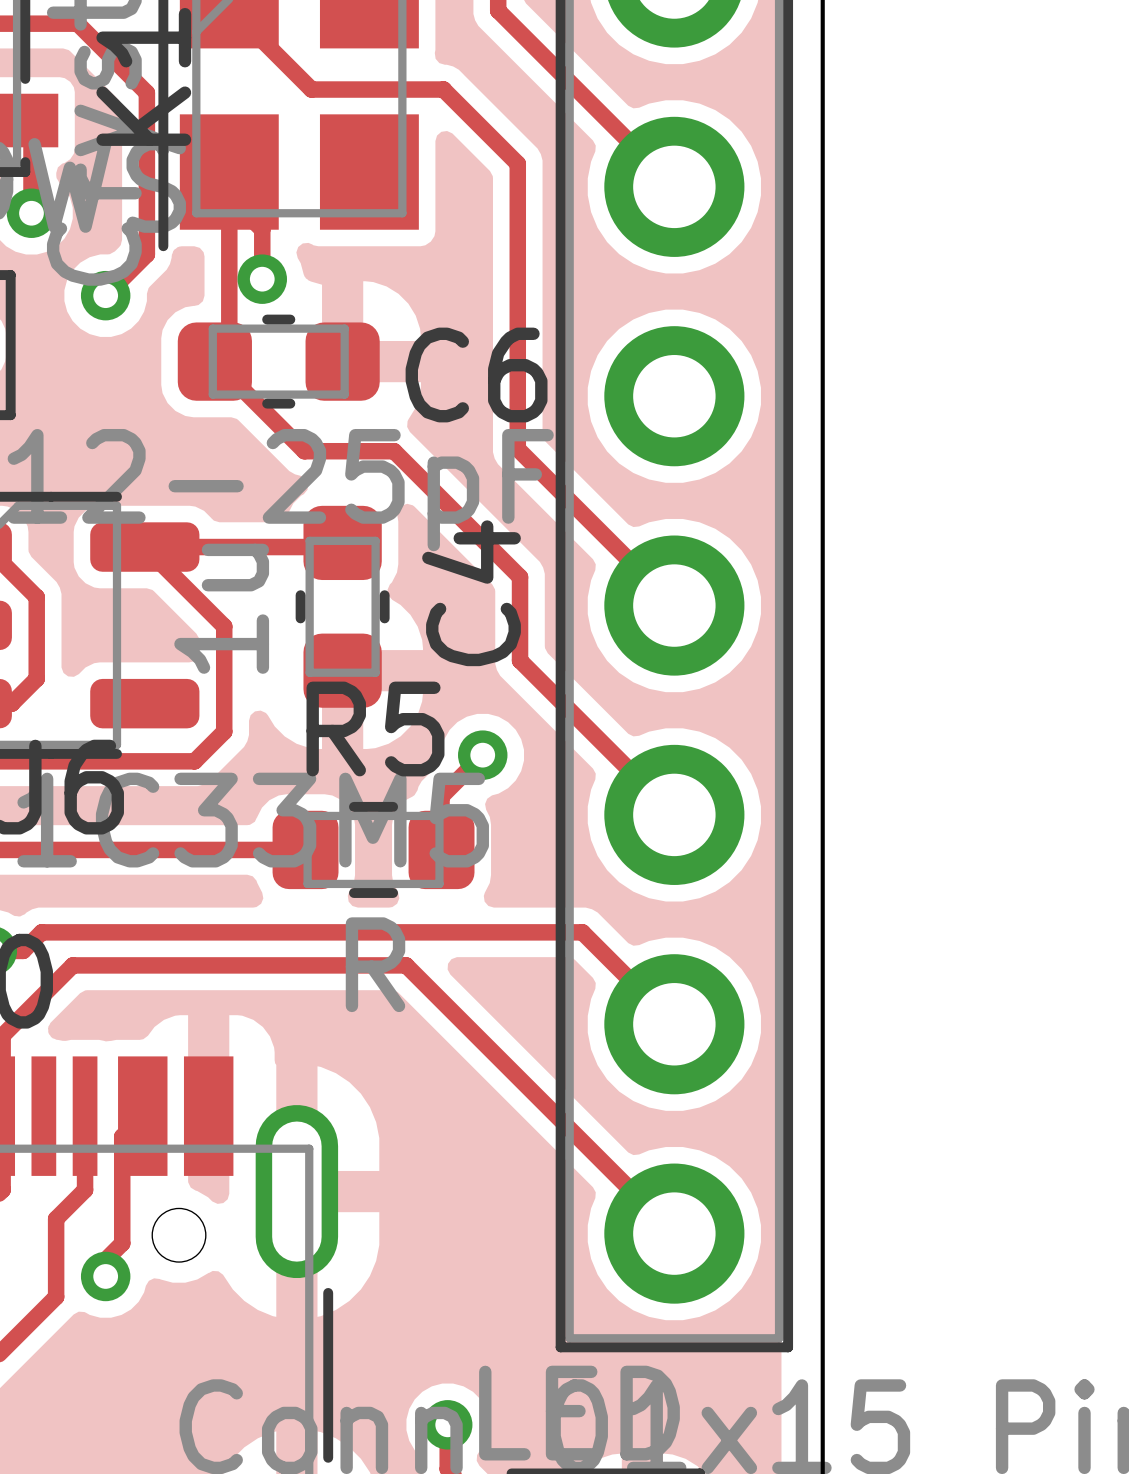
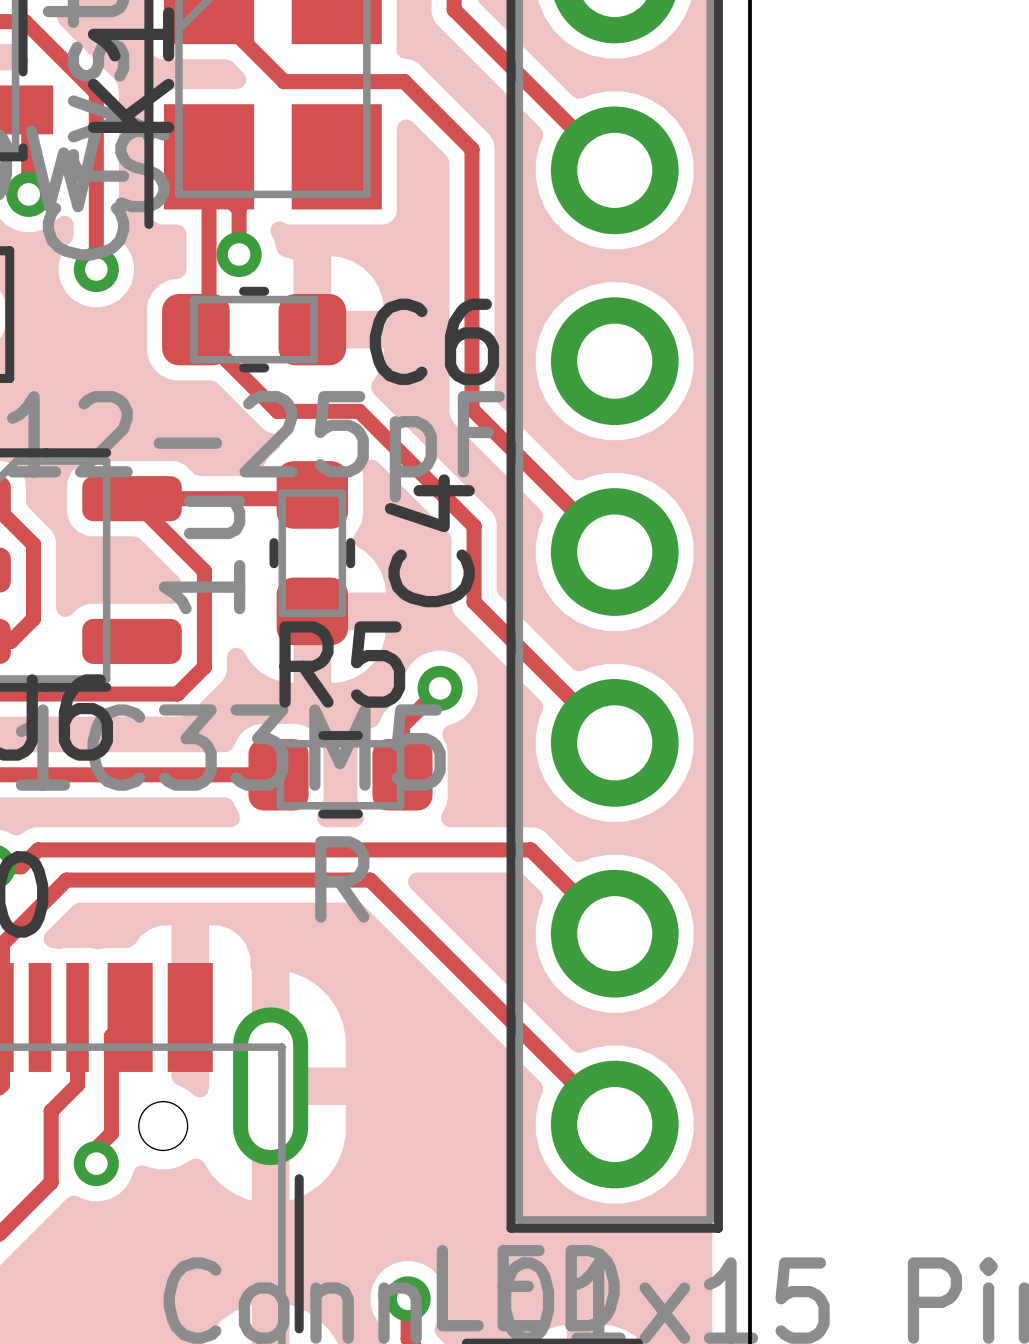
track: (27, 23) (77, 23) (146, 92) (146, 254) (105, 295) -> (24, 21) (96, 92) (96, 269)

